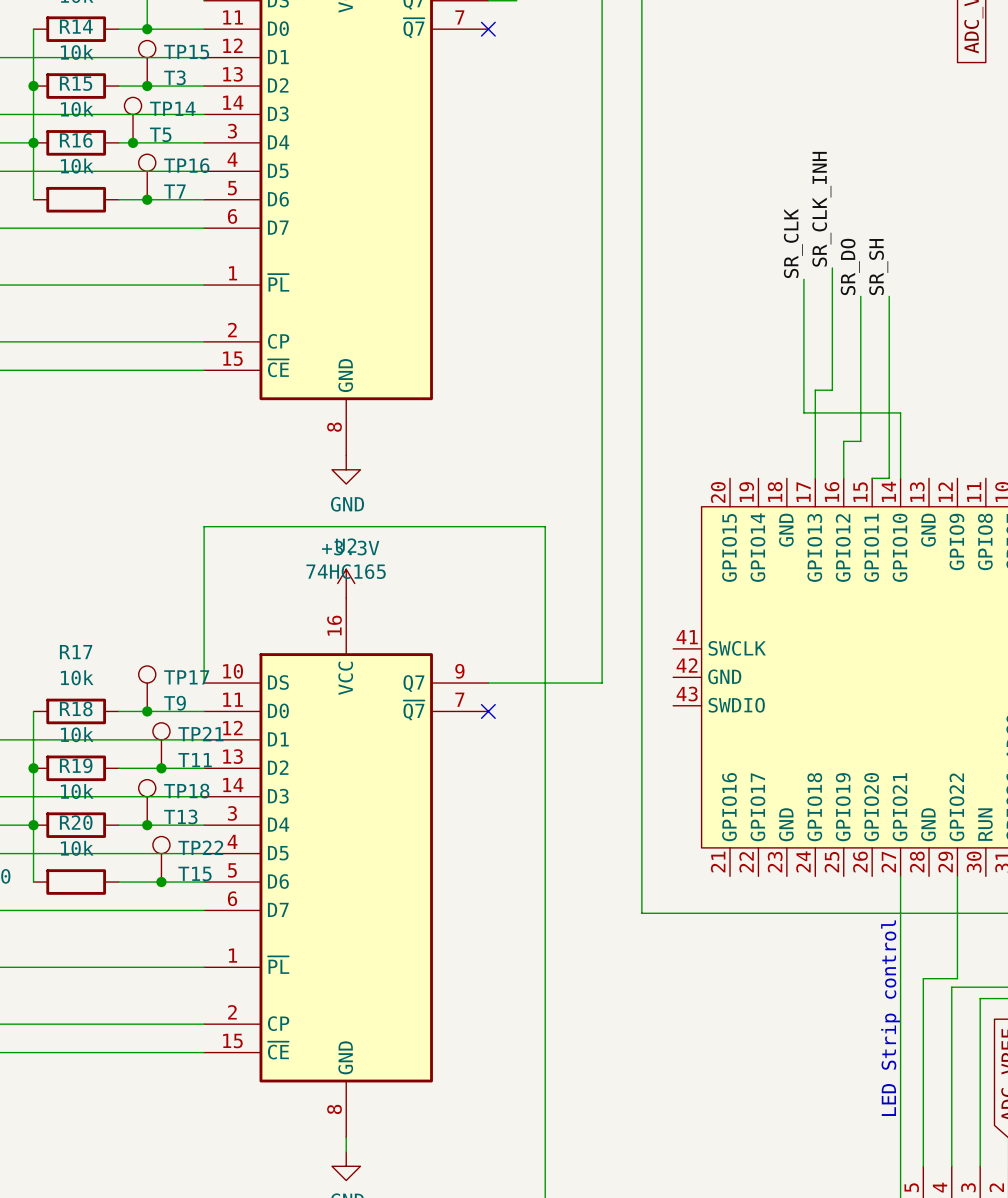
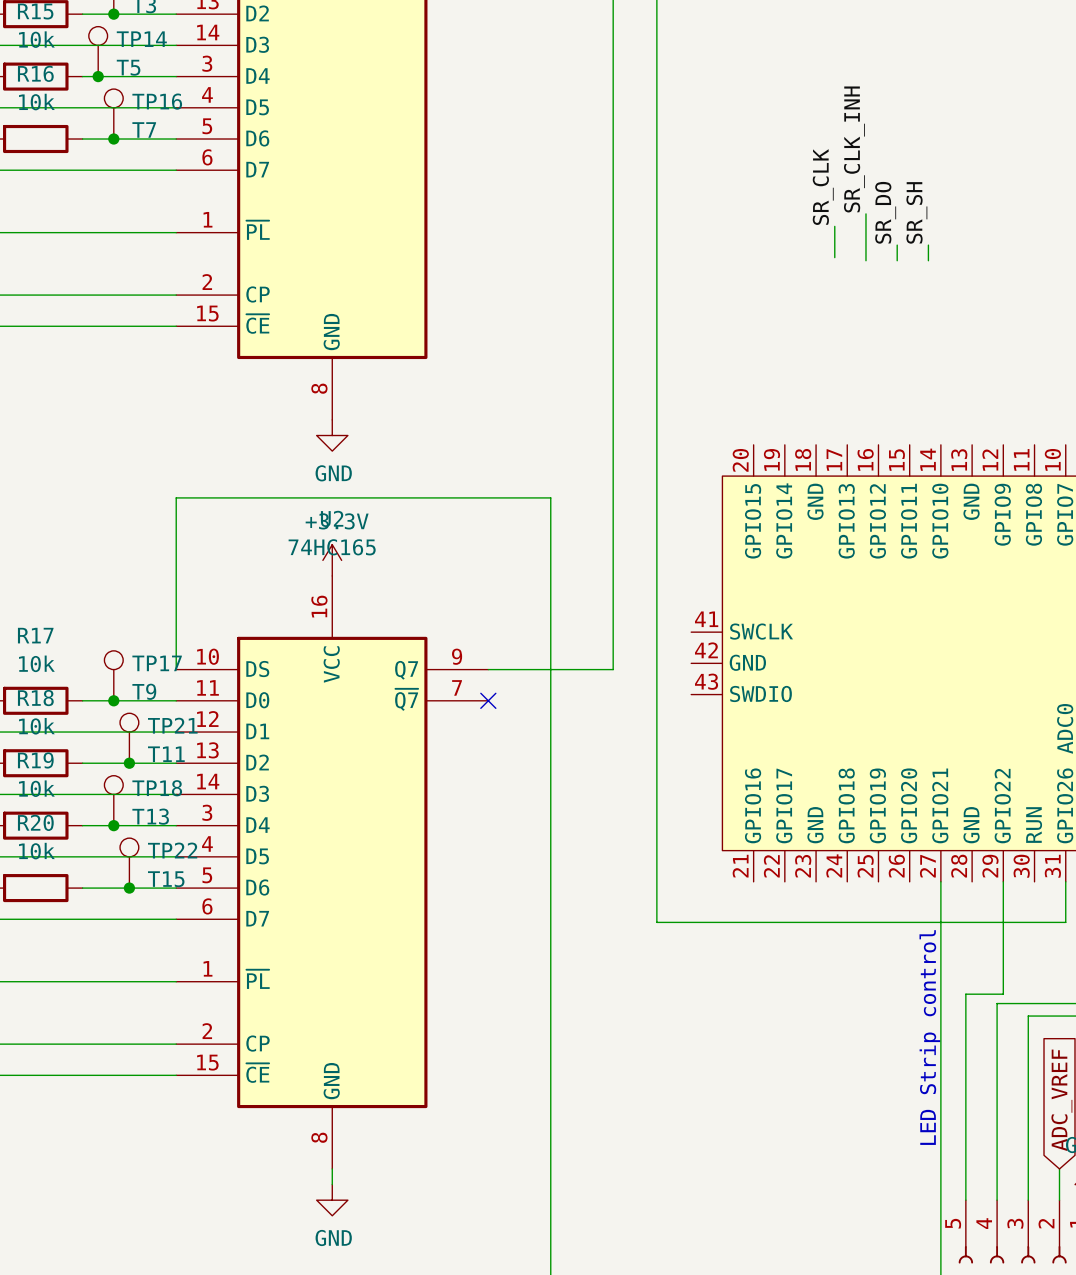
wire: (803, 307) (803, 412) (900, 412) (900, 478) -> none
wire: (832, 310) (832, 390) (815, 390) (815, 478) -> none
wire: (860, 310) (860, 441) (843, 441) (843, 478) -> none
wire: (889, 310) (889, 478) (872, 478) -> none

